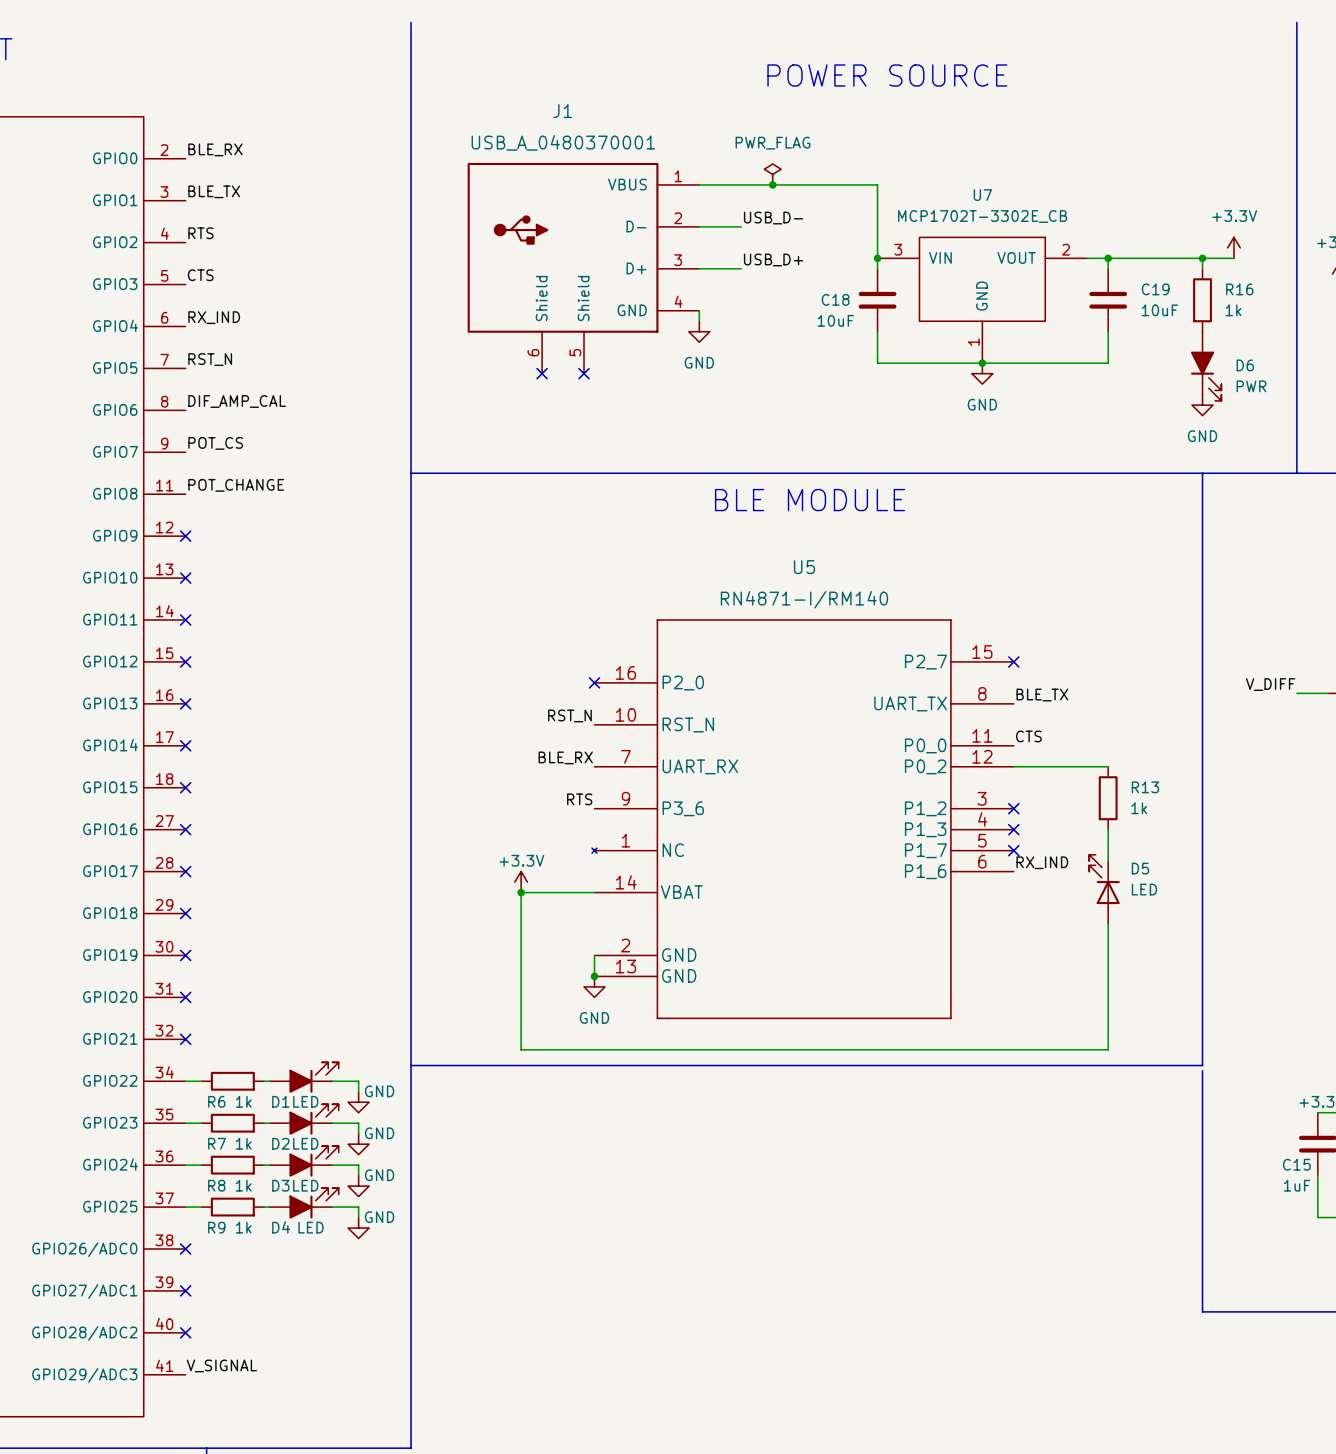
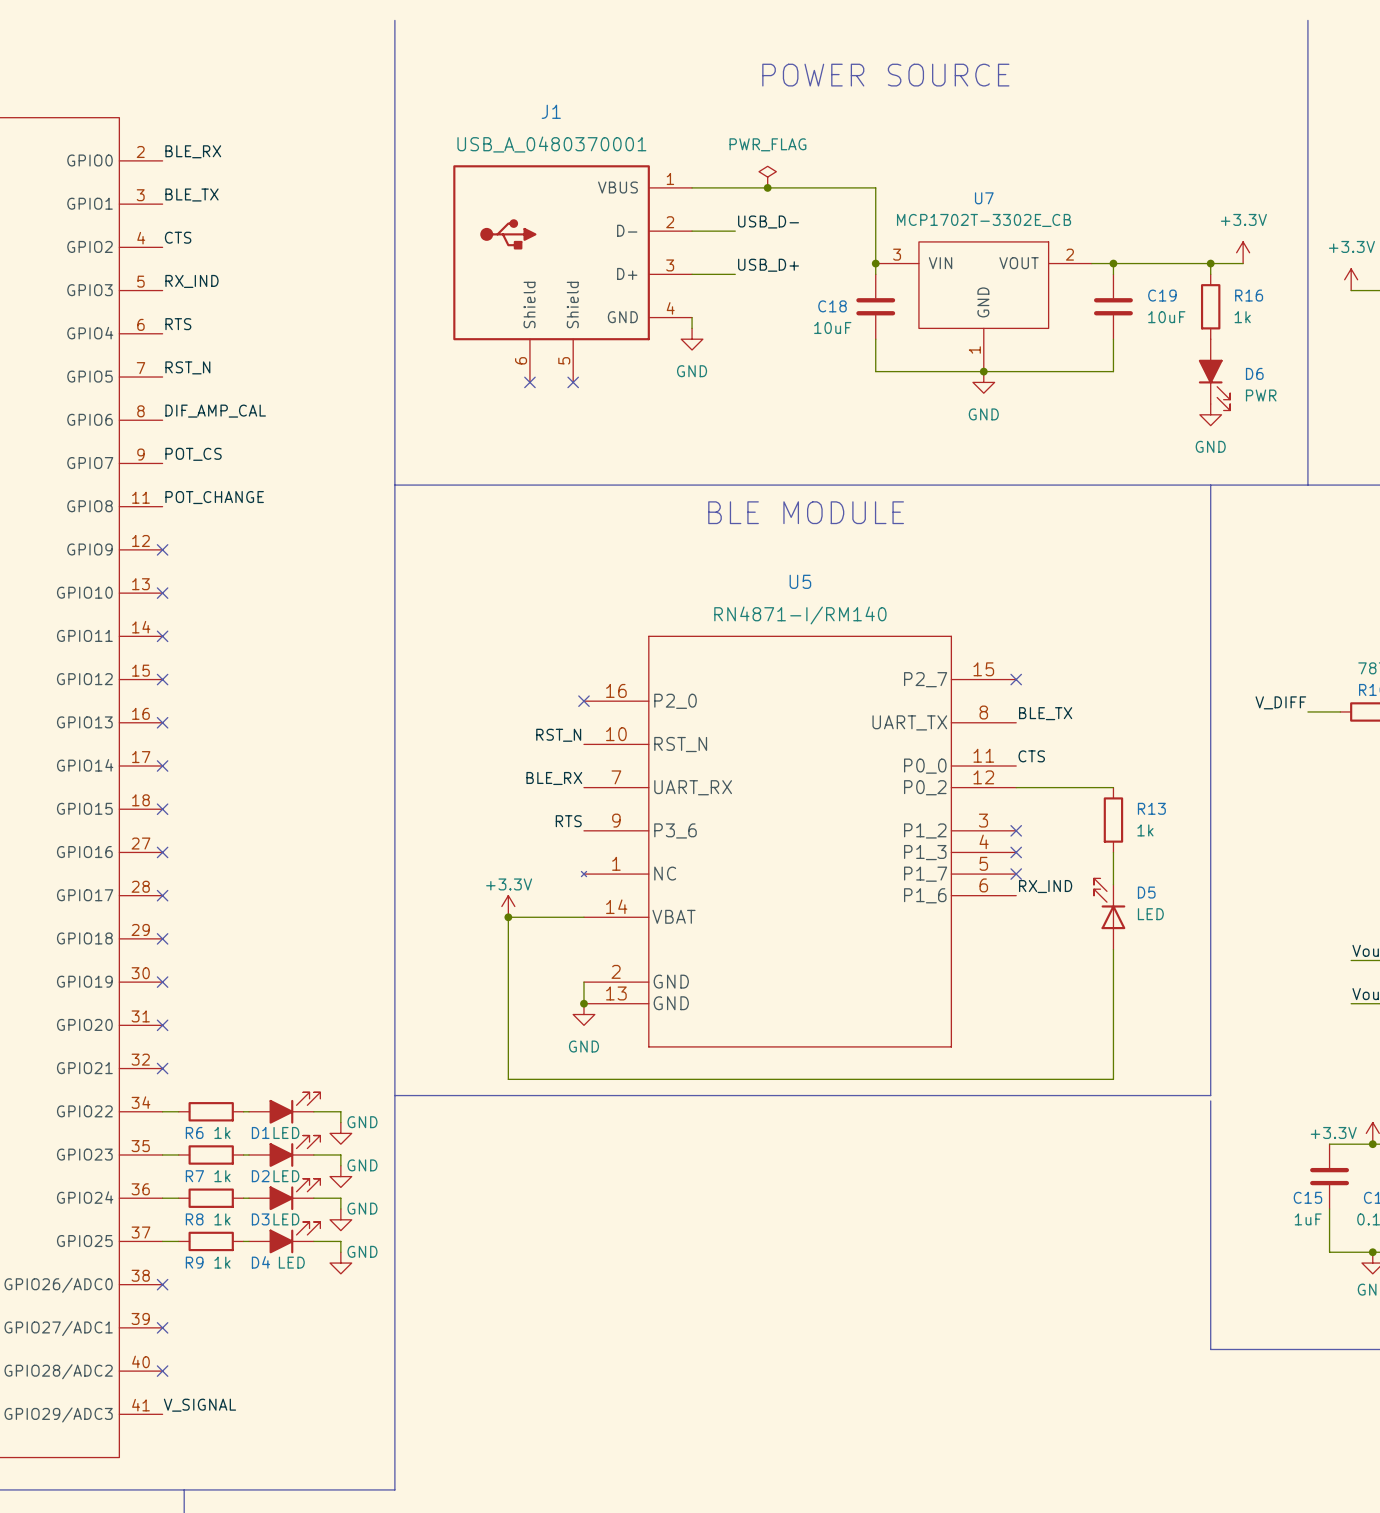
label: RTS (200, 233) -> CTS (178, 237)
label: CTS (200, 275) -> RX_IND (191, 281)
label: RX_IND (214, 317) -> RTS (178, 324)

